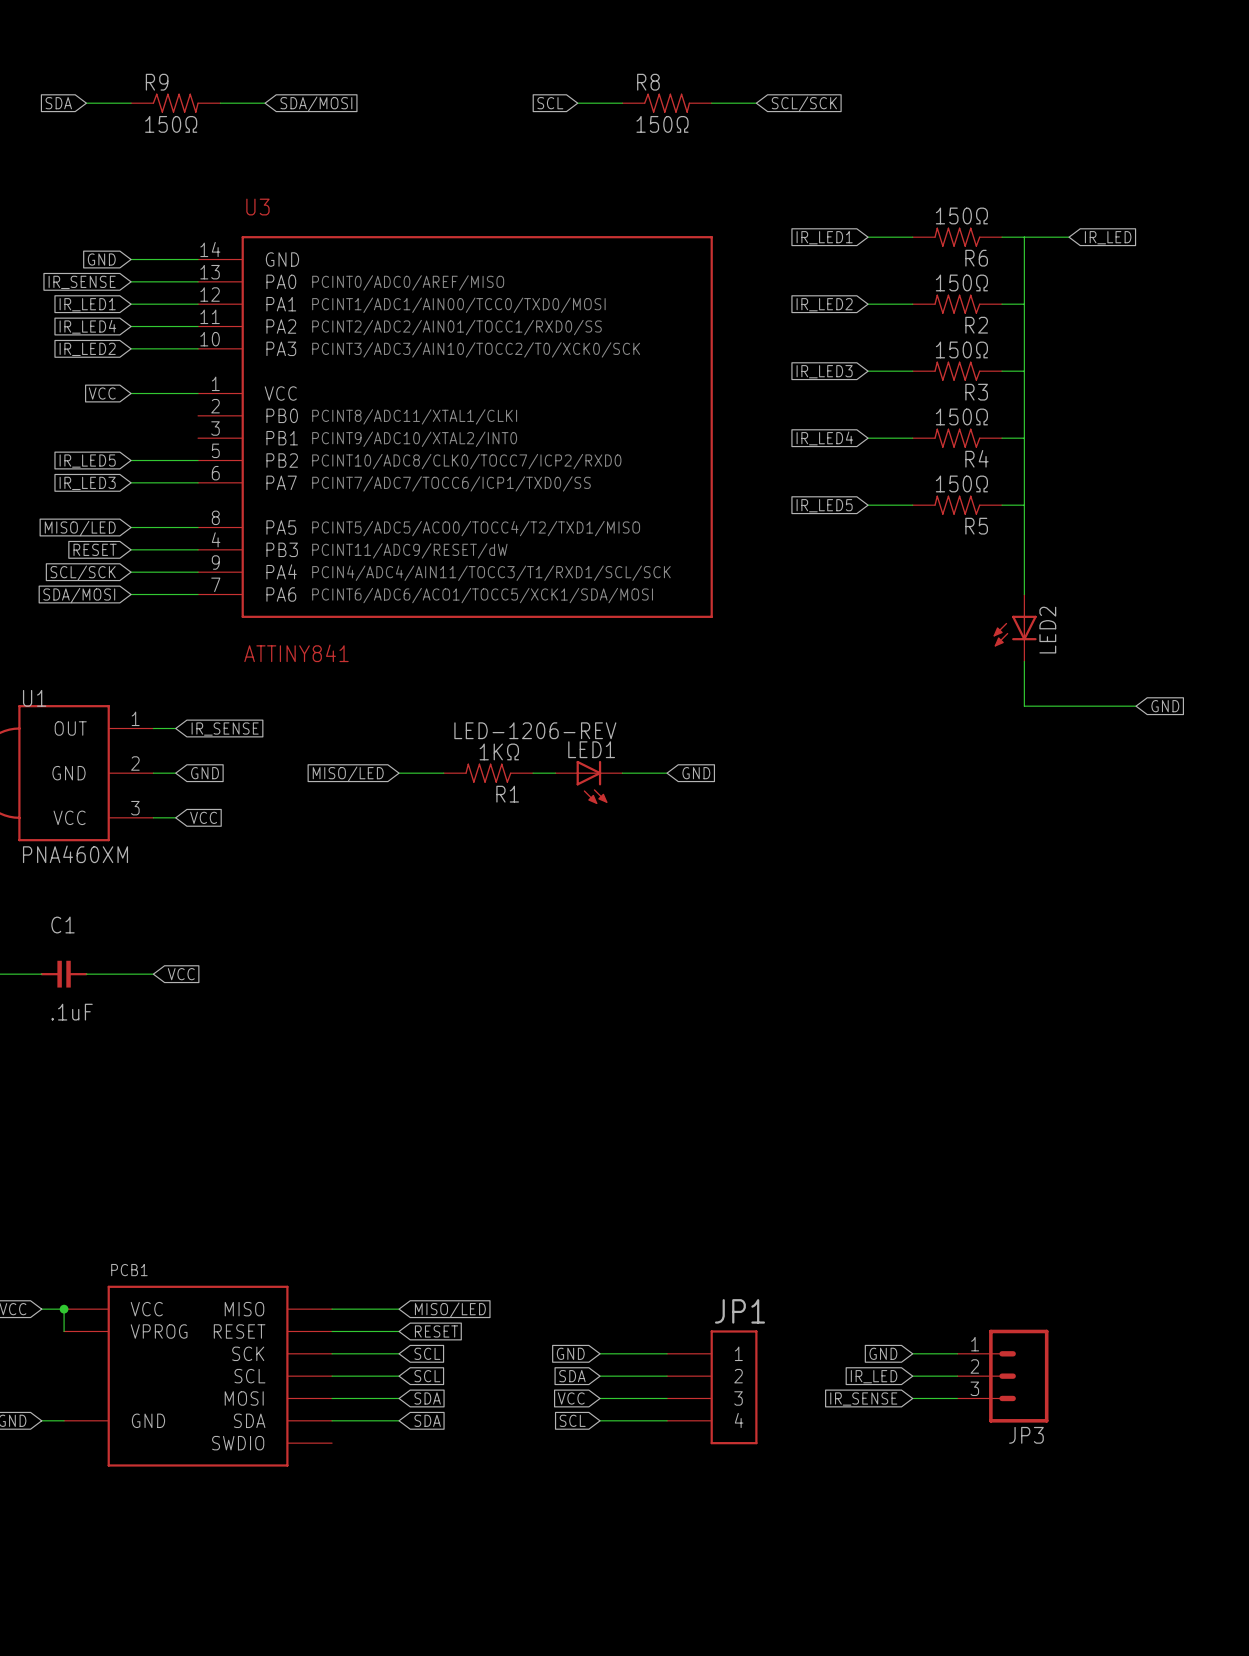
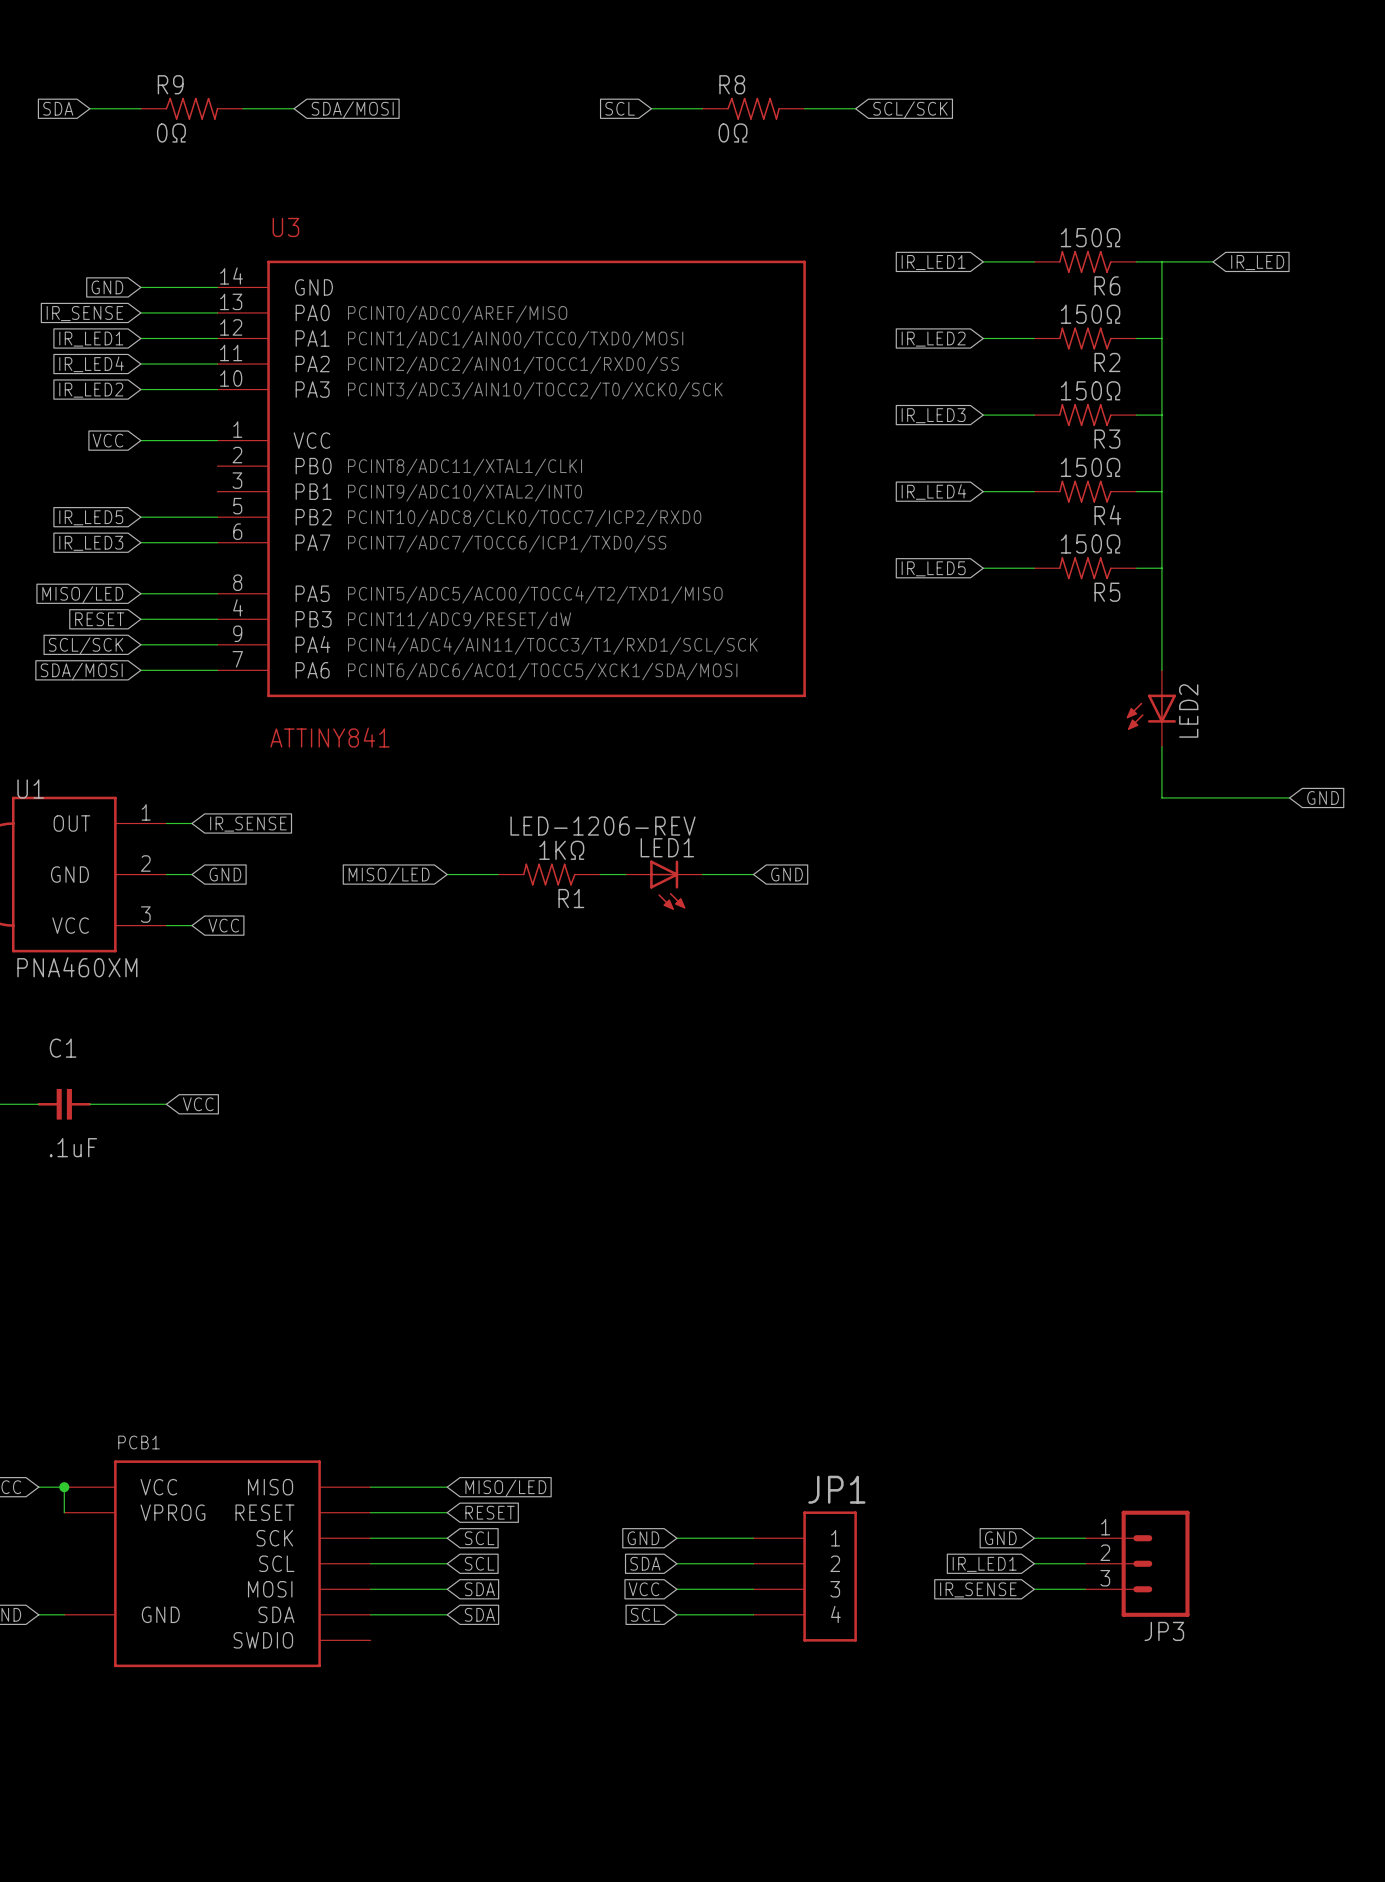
R9 value: 150Ω (171, 124) -> 0Ω (171, 133)
R8 value: 150Ω (662, 124) -> 0Ω (733, 133)
global label: IR_LED (874, 1376) -> IR_LED1 (984, 1564)

